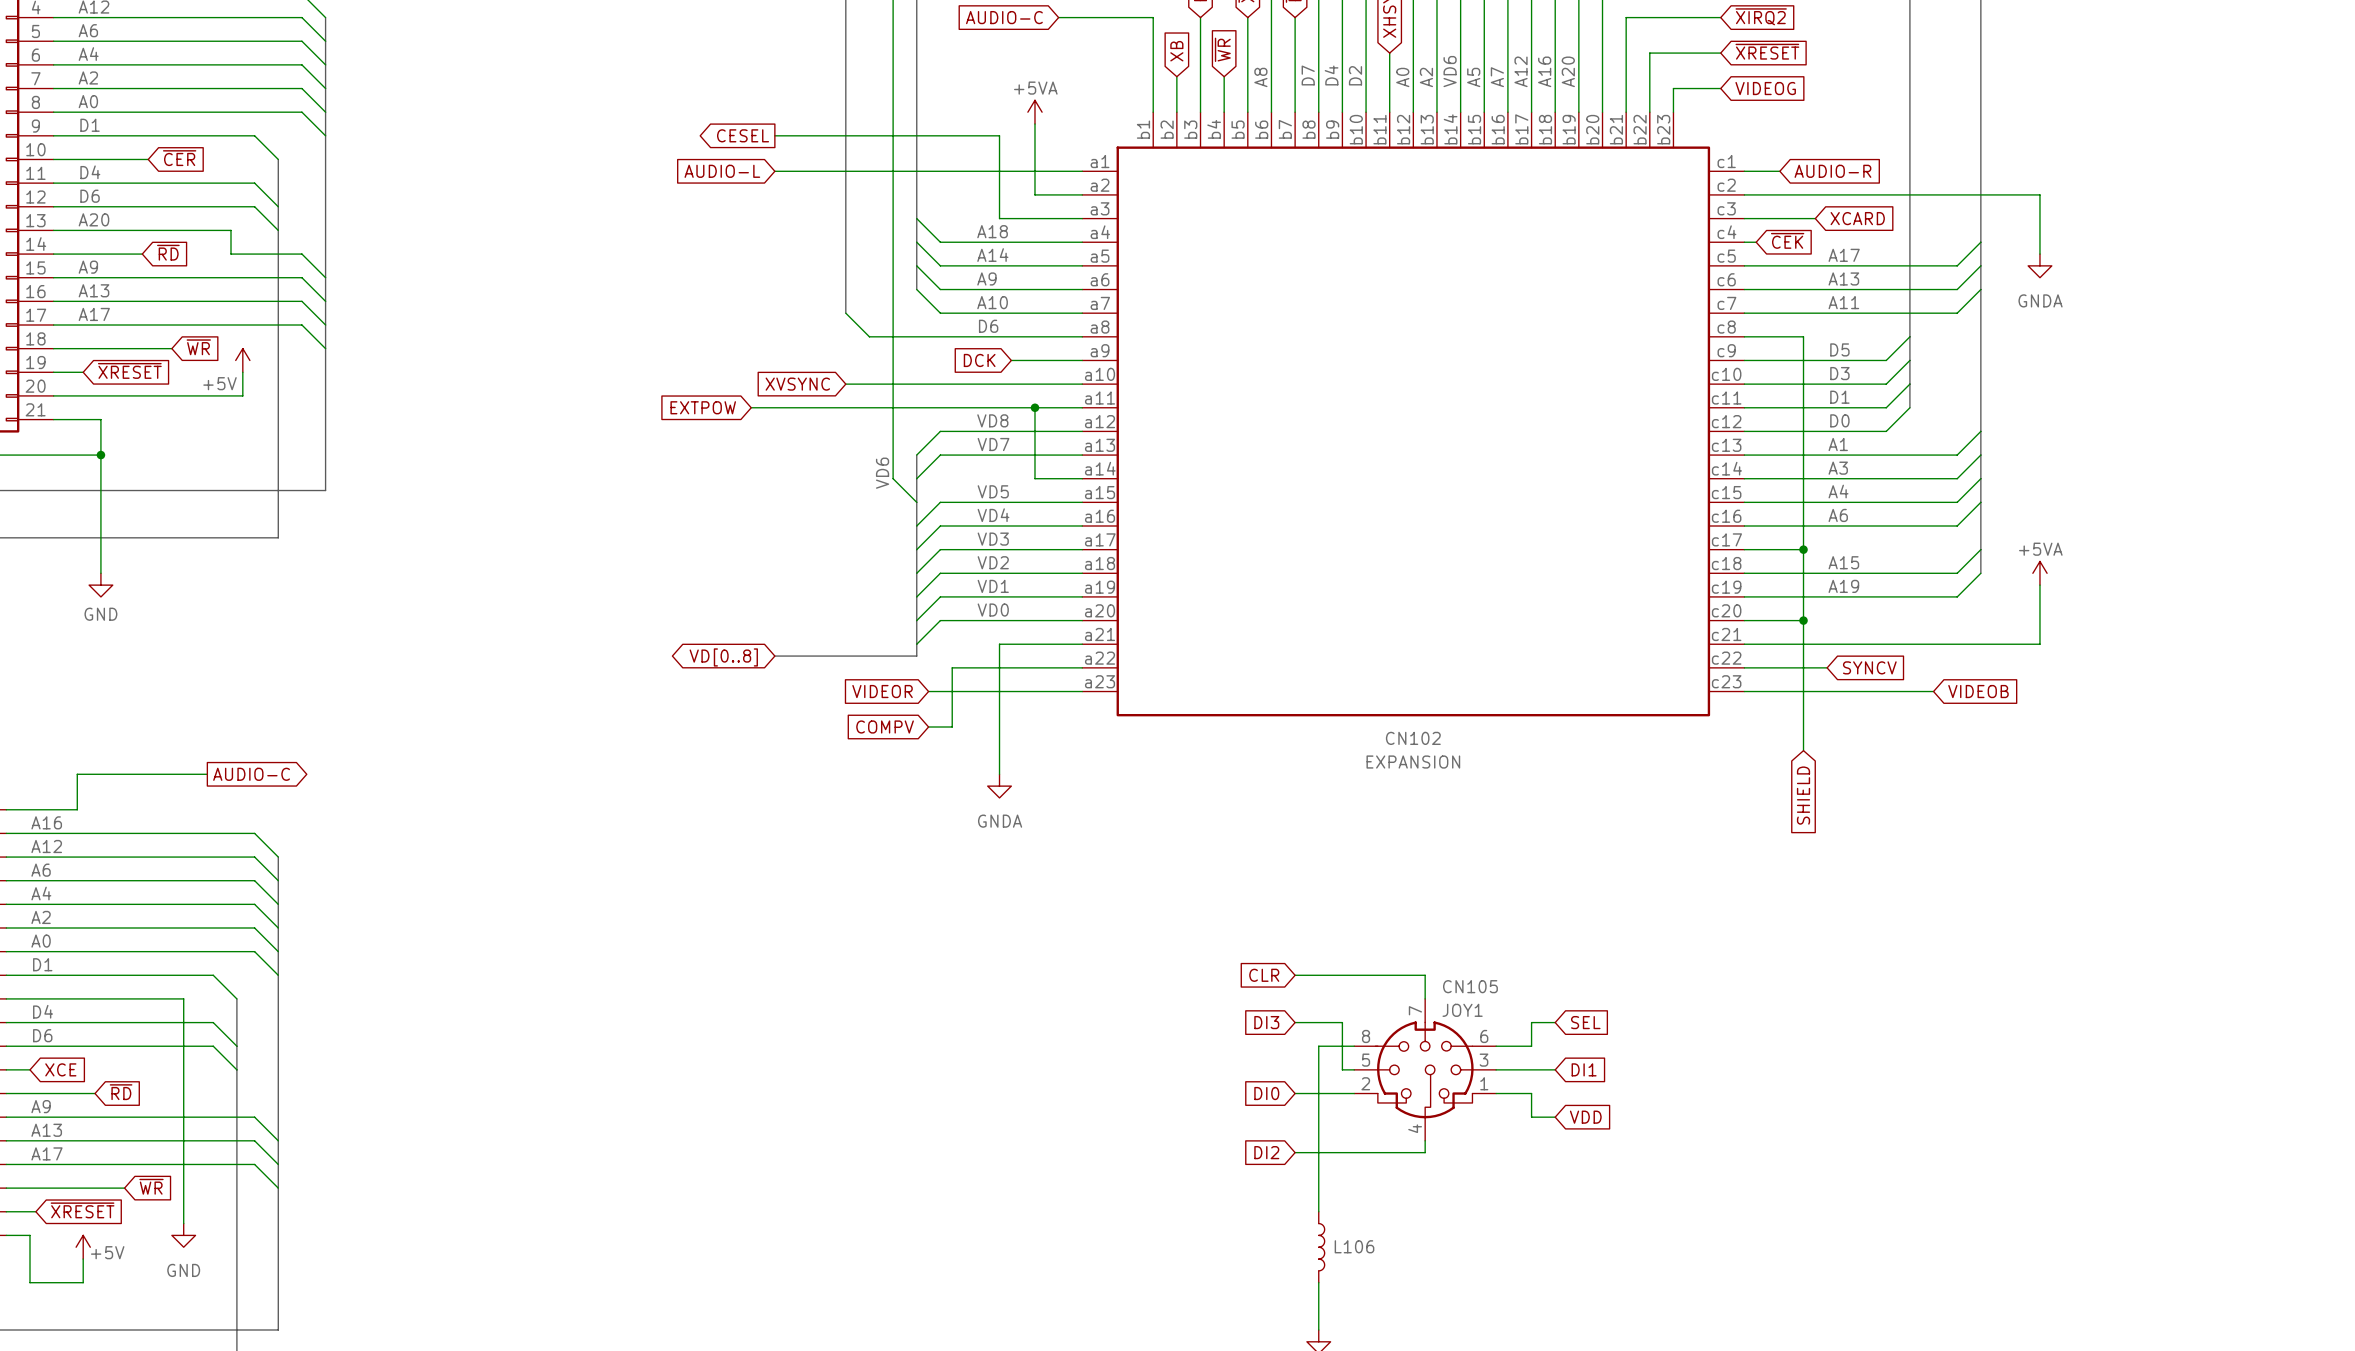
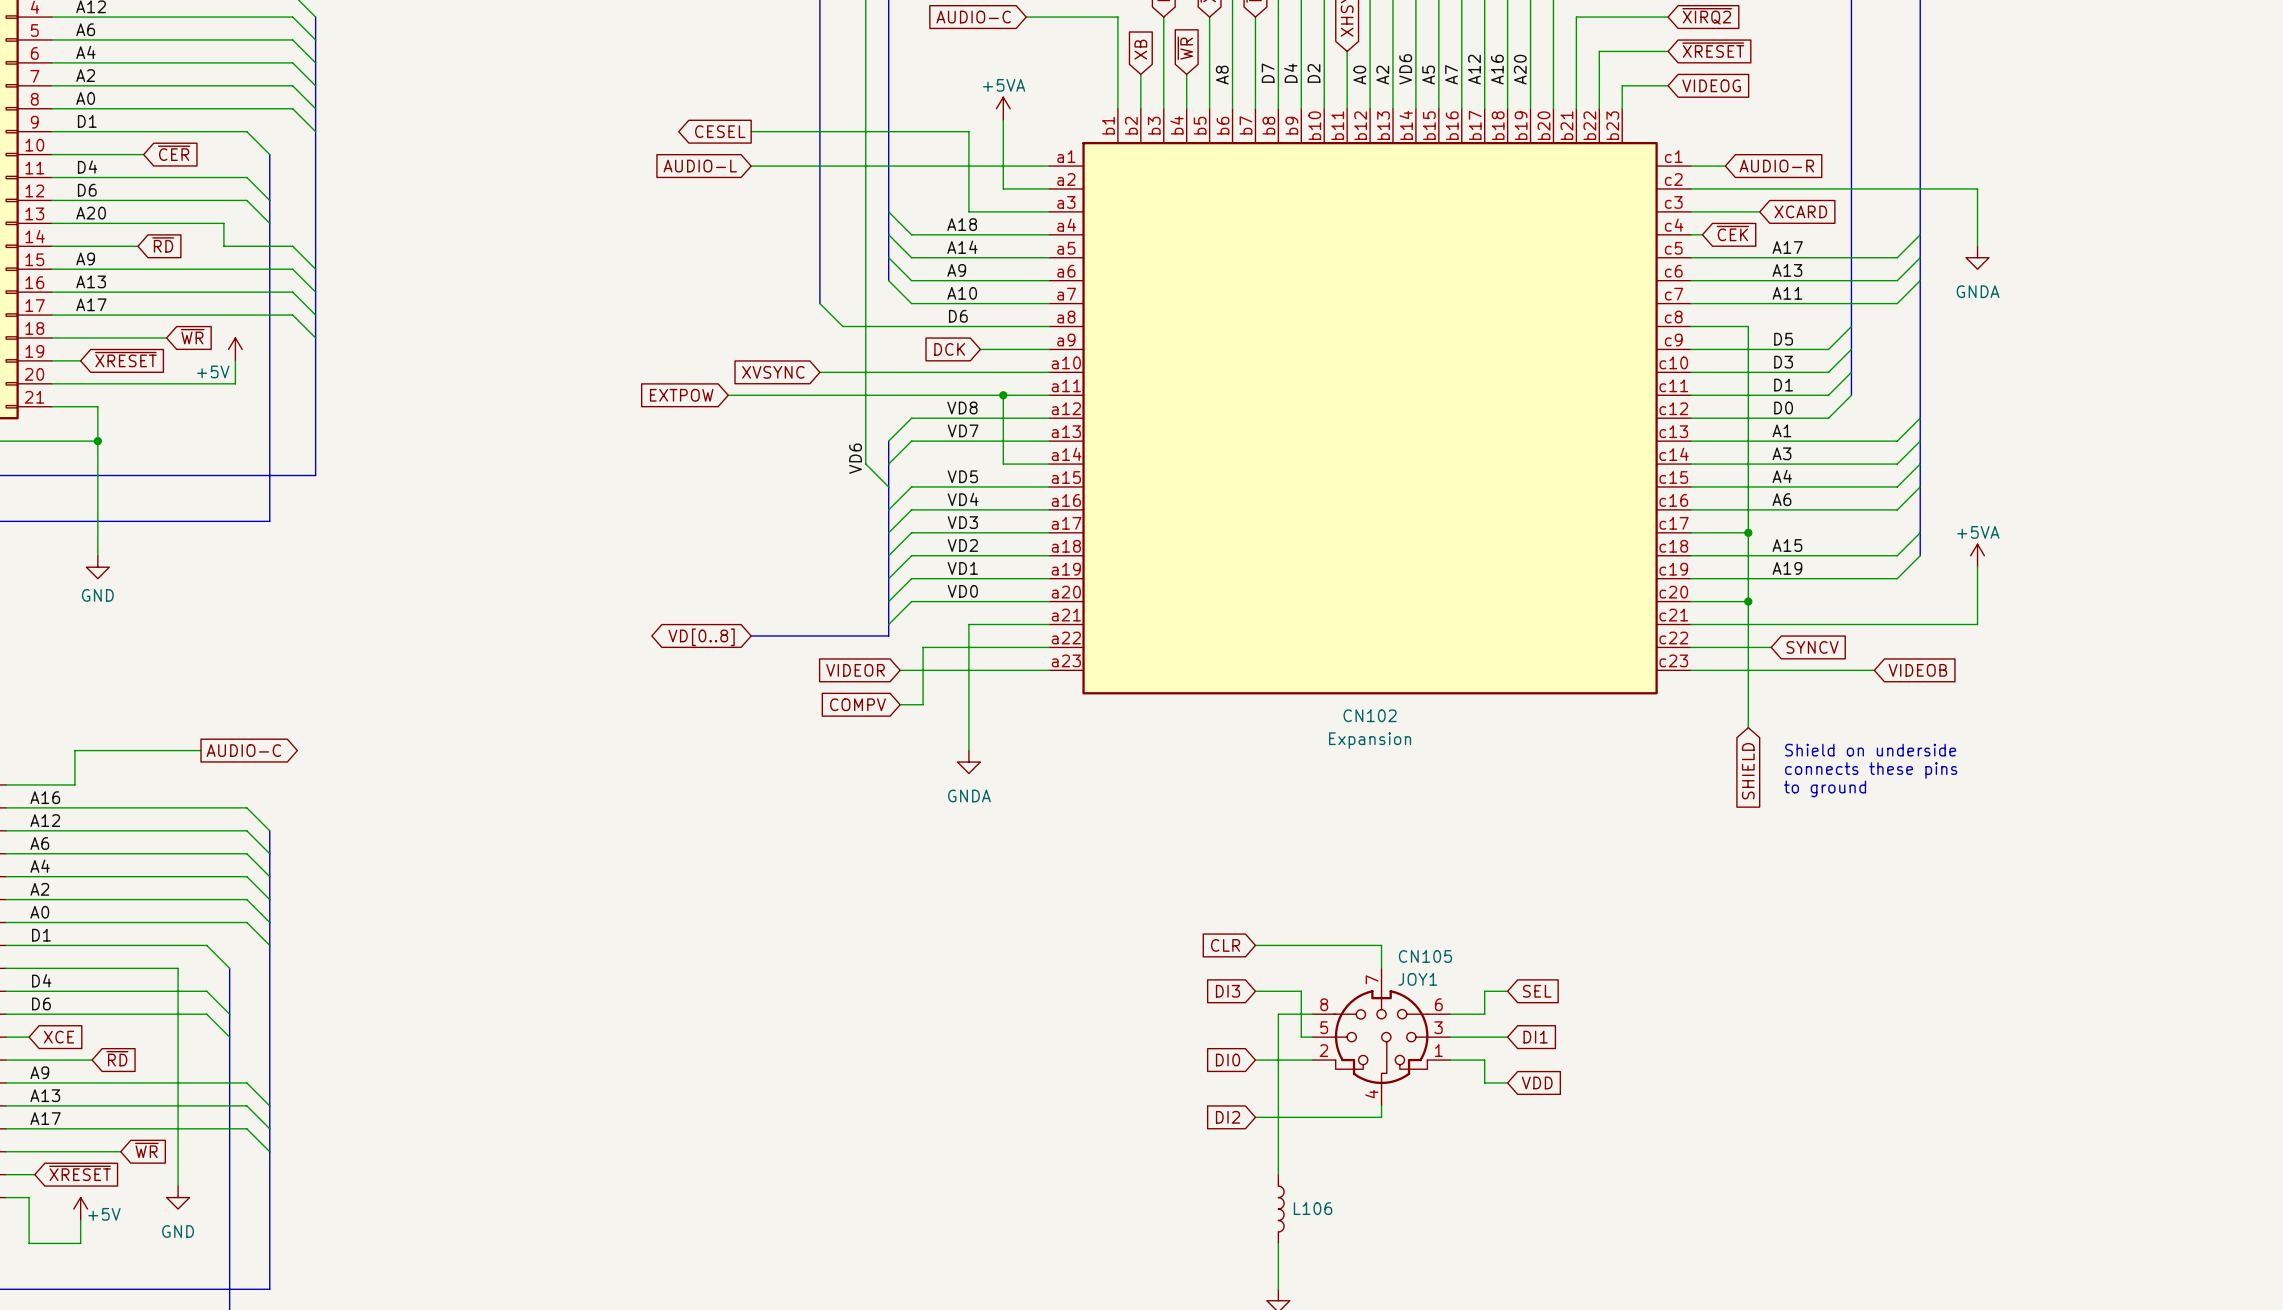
CN102 value: EXPANSION (1413, 762) -> Expansion (1370, 740)
text: none -> Shield on underside (1870, 750)
text: none -> connects these pins (1871, 770)
text: none -> to ground (1825, 788)

